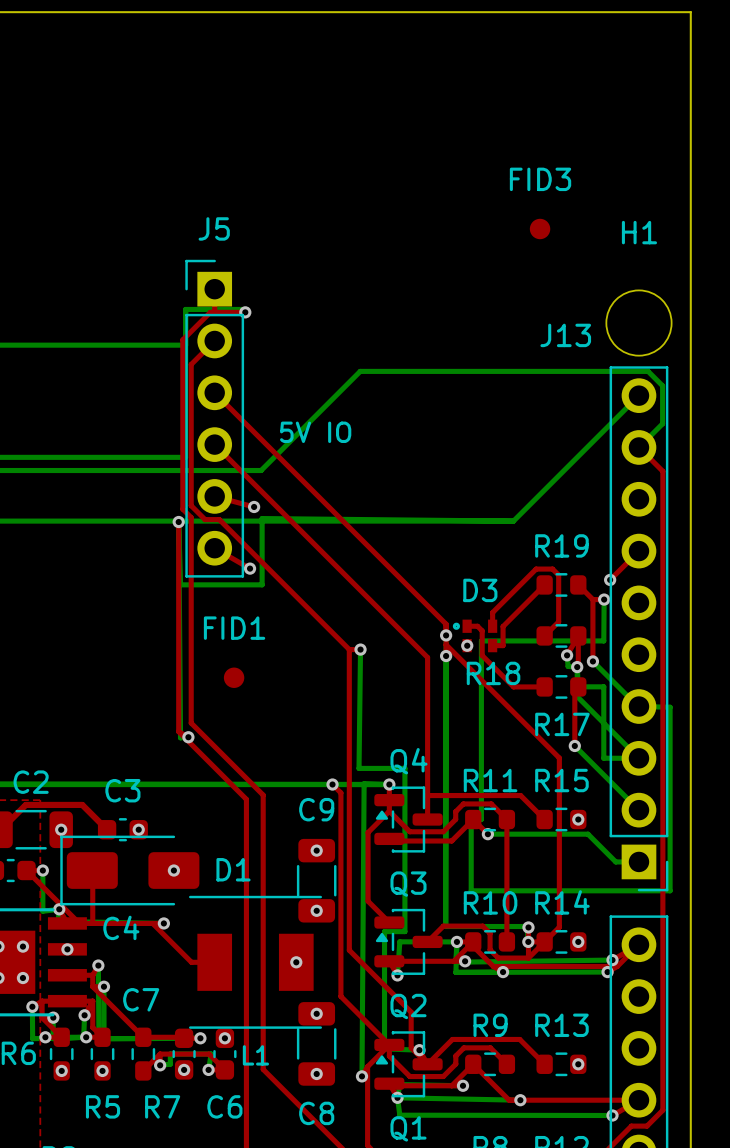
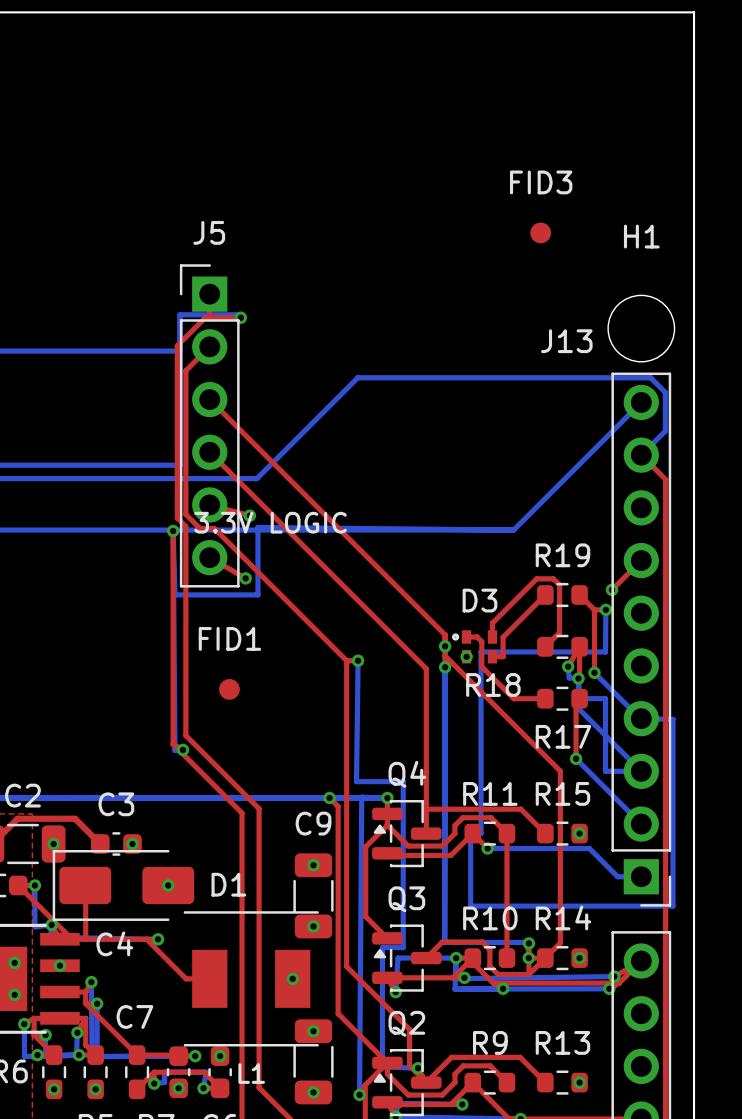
text: 5V IO (315, 432) -> none
text: none -> 3.3V LOGIC (270, 522)

